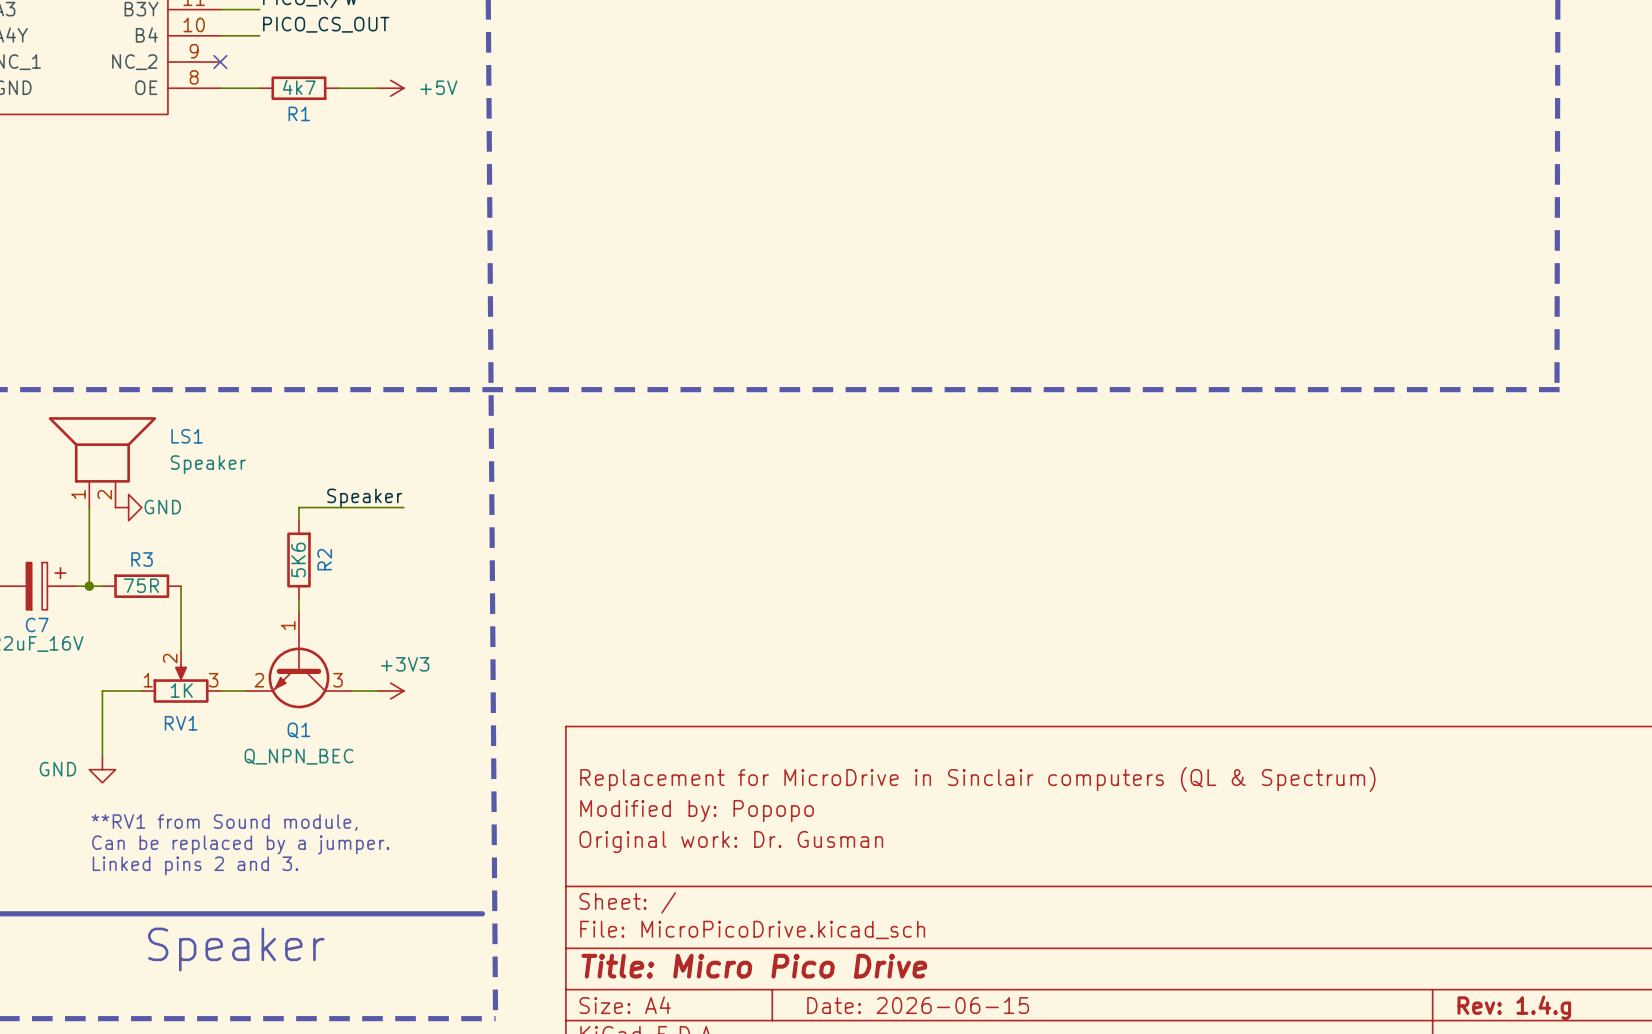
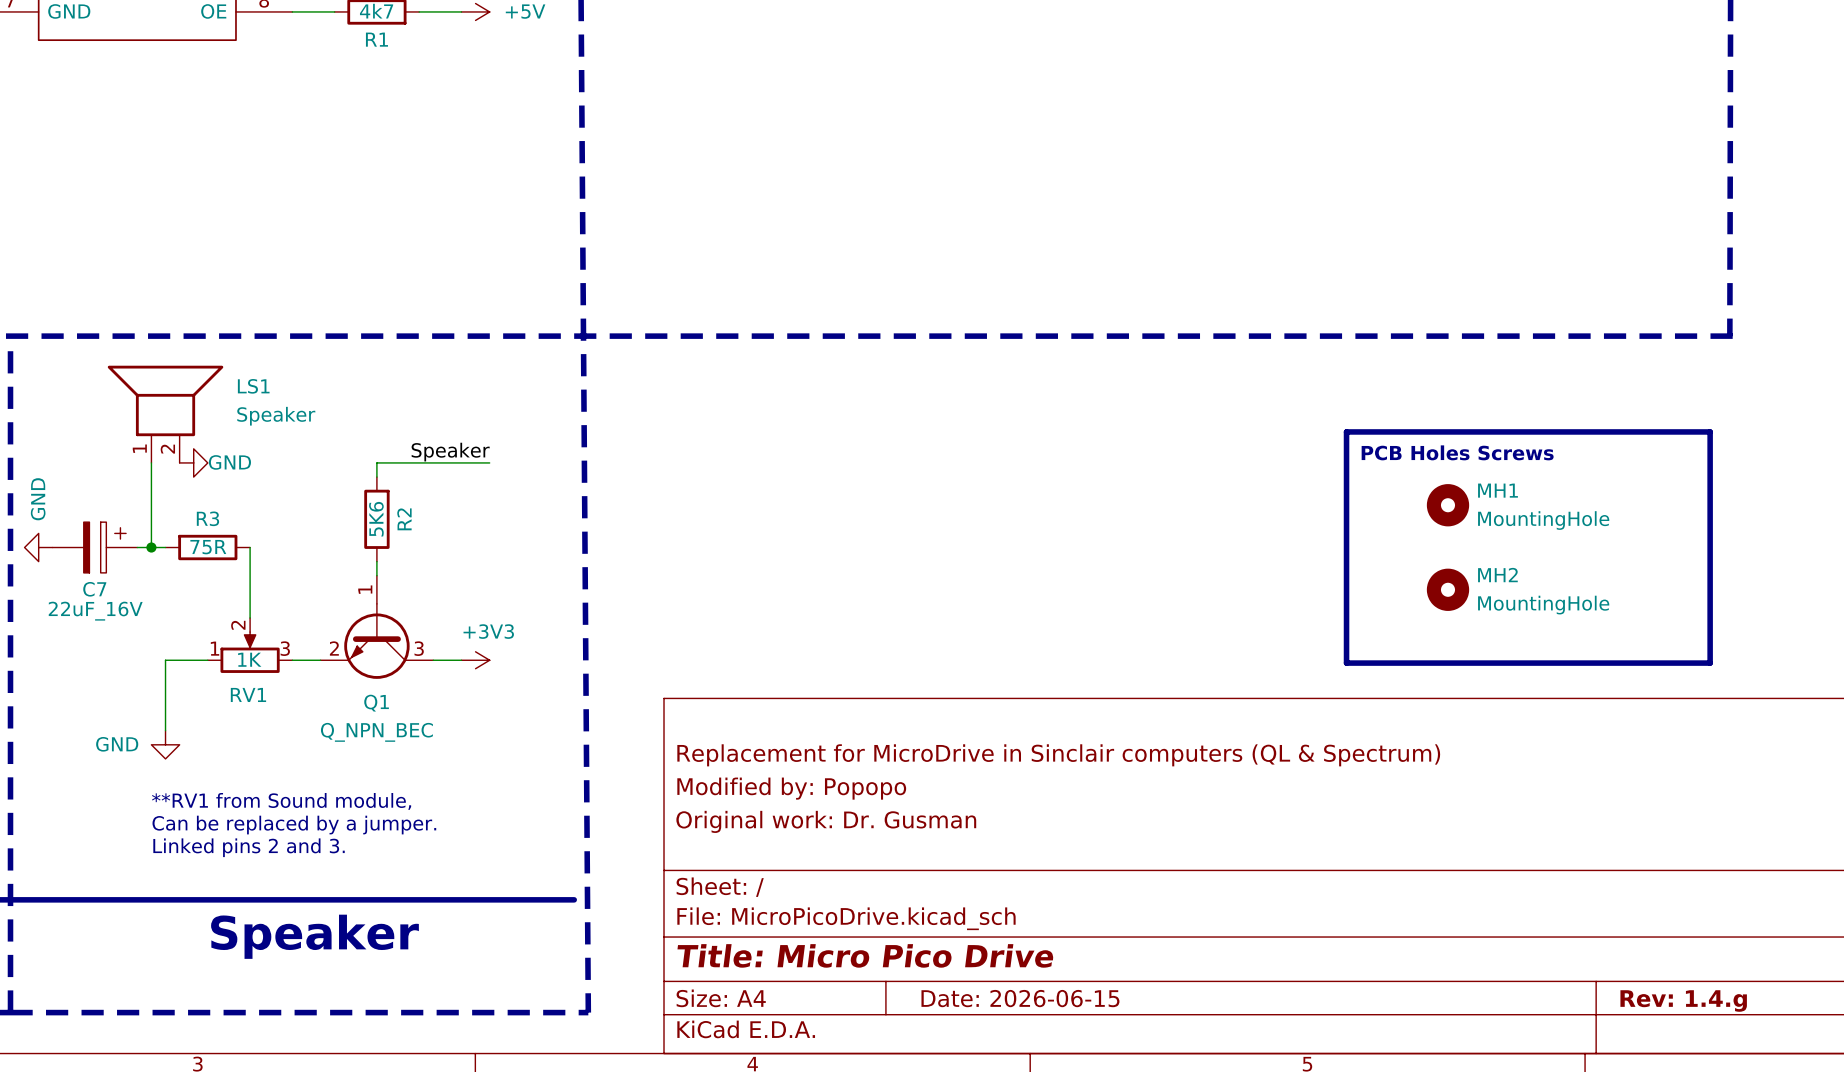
line: none -> (1346, 431) (1710, 431) (1710, 663) (1346, 663) (1346, 431)
text: none -> PCB Holes Screws (1457, 452)
MH1: none -> MountingHole (1448, 505)
MH2: none -> MountingHole (1448, 589)

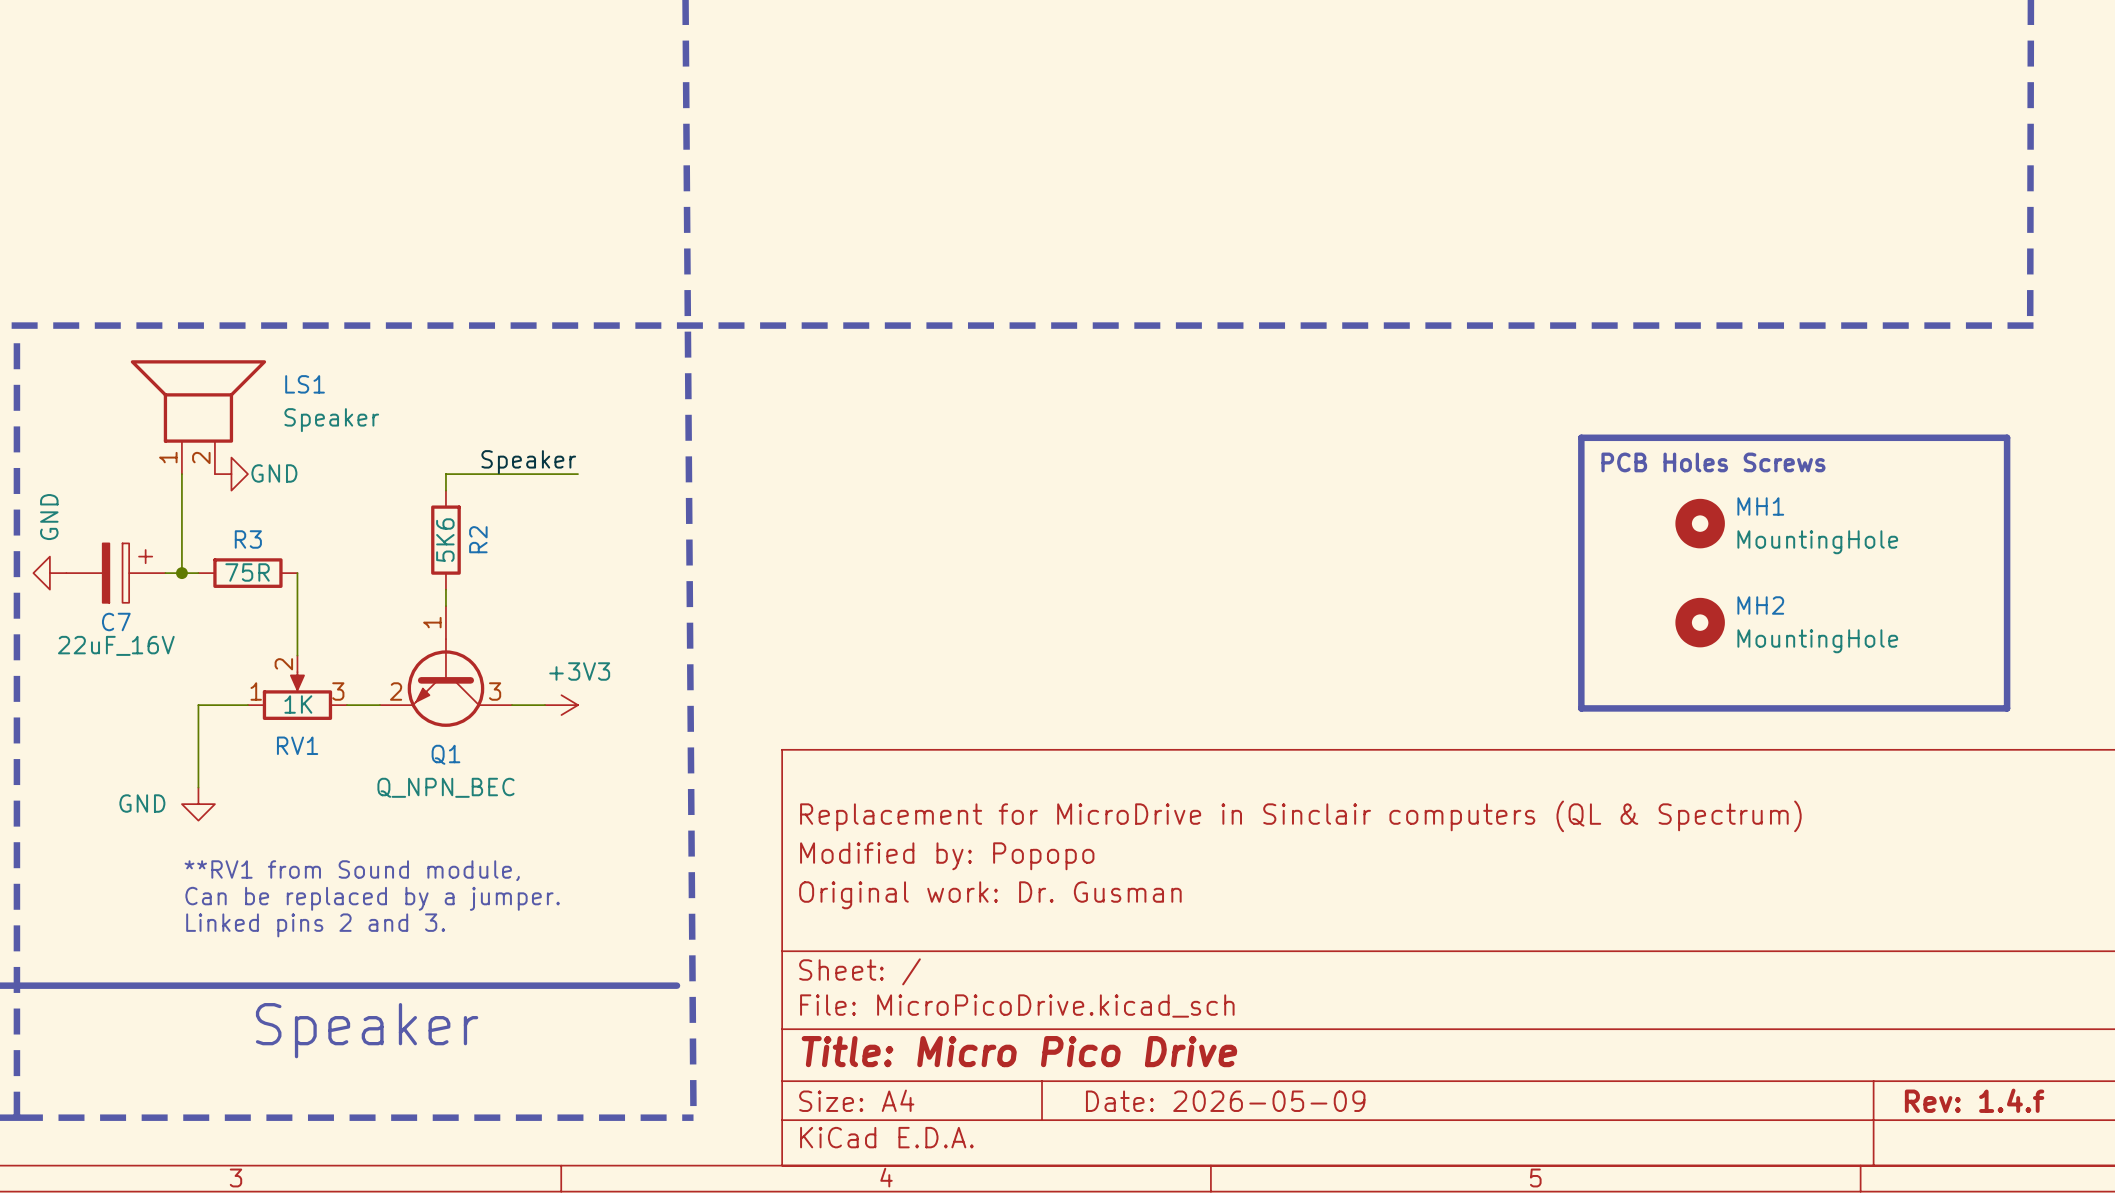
title block: Date: 2026-06-15 (1020, 998) -> Date: 2026-05-09 (1225, 1101)
title block: Rev: 1.4.g (1683, 1001) -> Rev: 1.4.f (1974, 1100)

